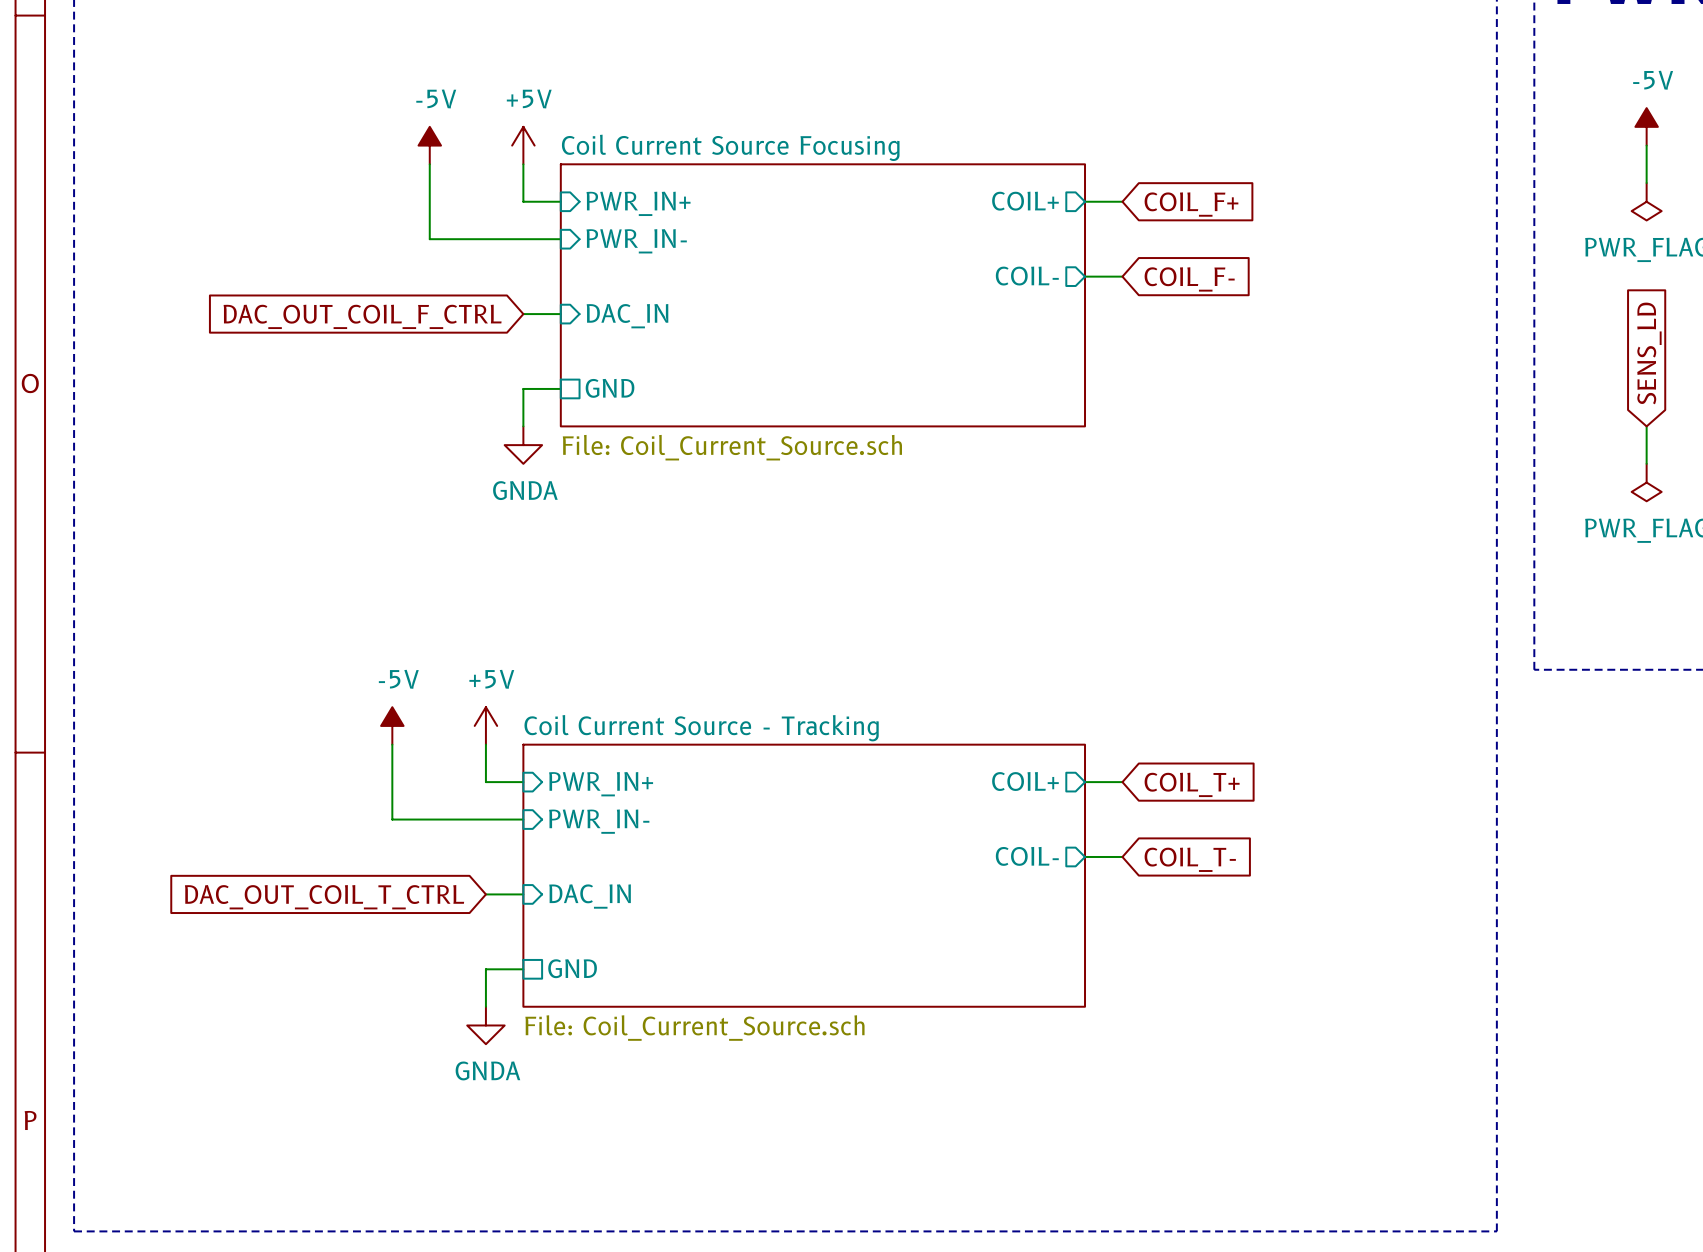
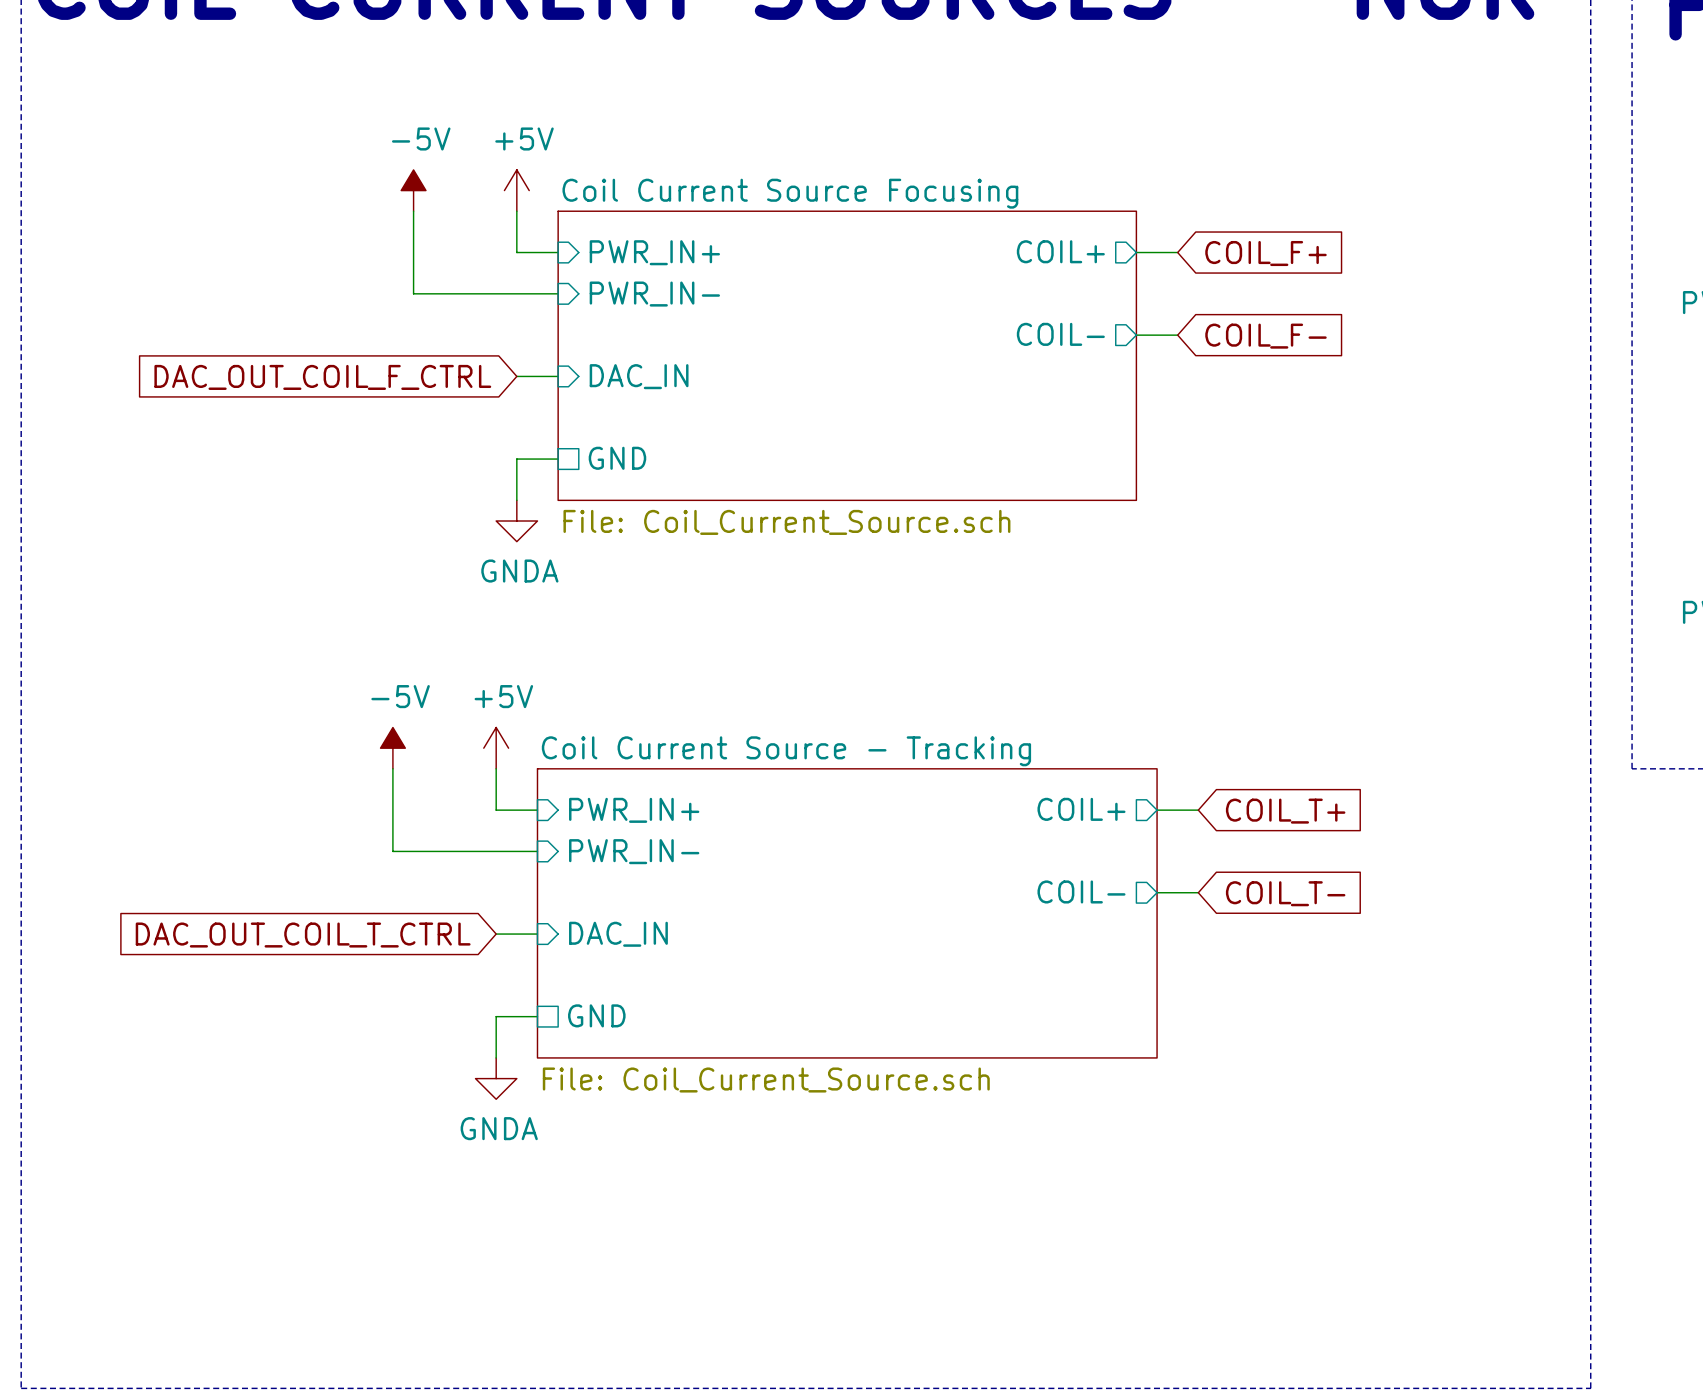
wire: none -> (392, 768) (392, 851) (537, 851)
power symbol position: -5V (392, 725) -> -5V (392, 748)
power symbol position: +5V (485, 725) -> +5V (496, 748)
wire: (392, 744) (392, 819) (504, 819) -> none
wire: (485, 744) (485, 782) (523, 782) -> (496, 768) (496, 810) (537, 810)
sheet pin position: COIL+ (1025, 781) -> COIL+ (1081, 809)
wire: (1085, 782) (1103, 782) -> (1177, 892) (1198, 892)
sheet pin position: PWR_IN+ (601, 784) -> PWR_IN+ (634, 810)
global label position: COIL_T+ (1192, 784) -> COIL_T+ (1285, 811)
wire: none -> (516, 934) (537, 934)
sheet pin position: PWR_IN- (599, 821) -> PWR_IN- (634, 851)
sheet pin position: COIL- (1027, 856) -> COIL- (1081, 891)
wire: (1085, 856) (1122, 856) -> (1157, 810) (1198, 810)
global label position: COIL_T- (1190, 859) -> COIL_T- (1285, 893)
sheet Coil Current Source - Tracking position: (804, 875) -> (847, 913)
wire: (485, 894) (504, 894) -> (496, 1057) (496, 1016)
wire: none -> (516, 1016) (537, 1016)
sheet pin position: DAC_IN (590, 896) -> DAC_IN (618, 934)
global label position: DAC_OUT_COIL_T_CTRL (324, 897) -> DAC_OUT_COIL_T_CTRL (303, 935)
sheet pin position: GND (572, 968) -> GND (596, 1015)
wire: (523, 969) (485, 969) (485, 1006) -> none
power symbol position: GNDA (485, 1025) -> GNDA (496, 1078)

